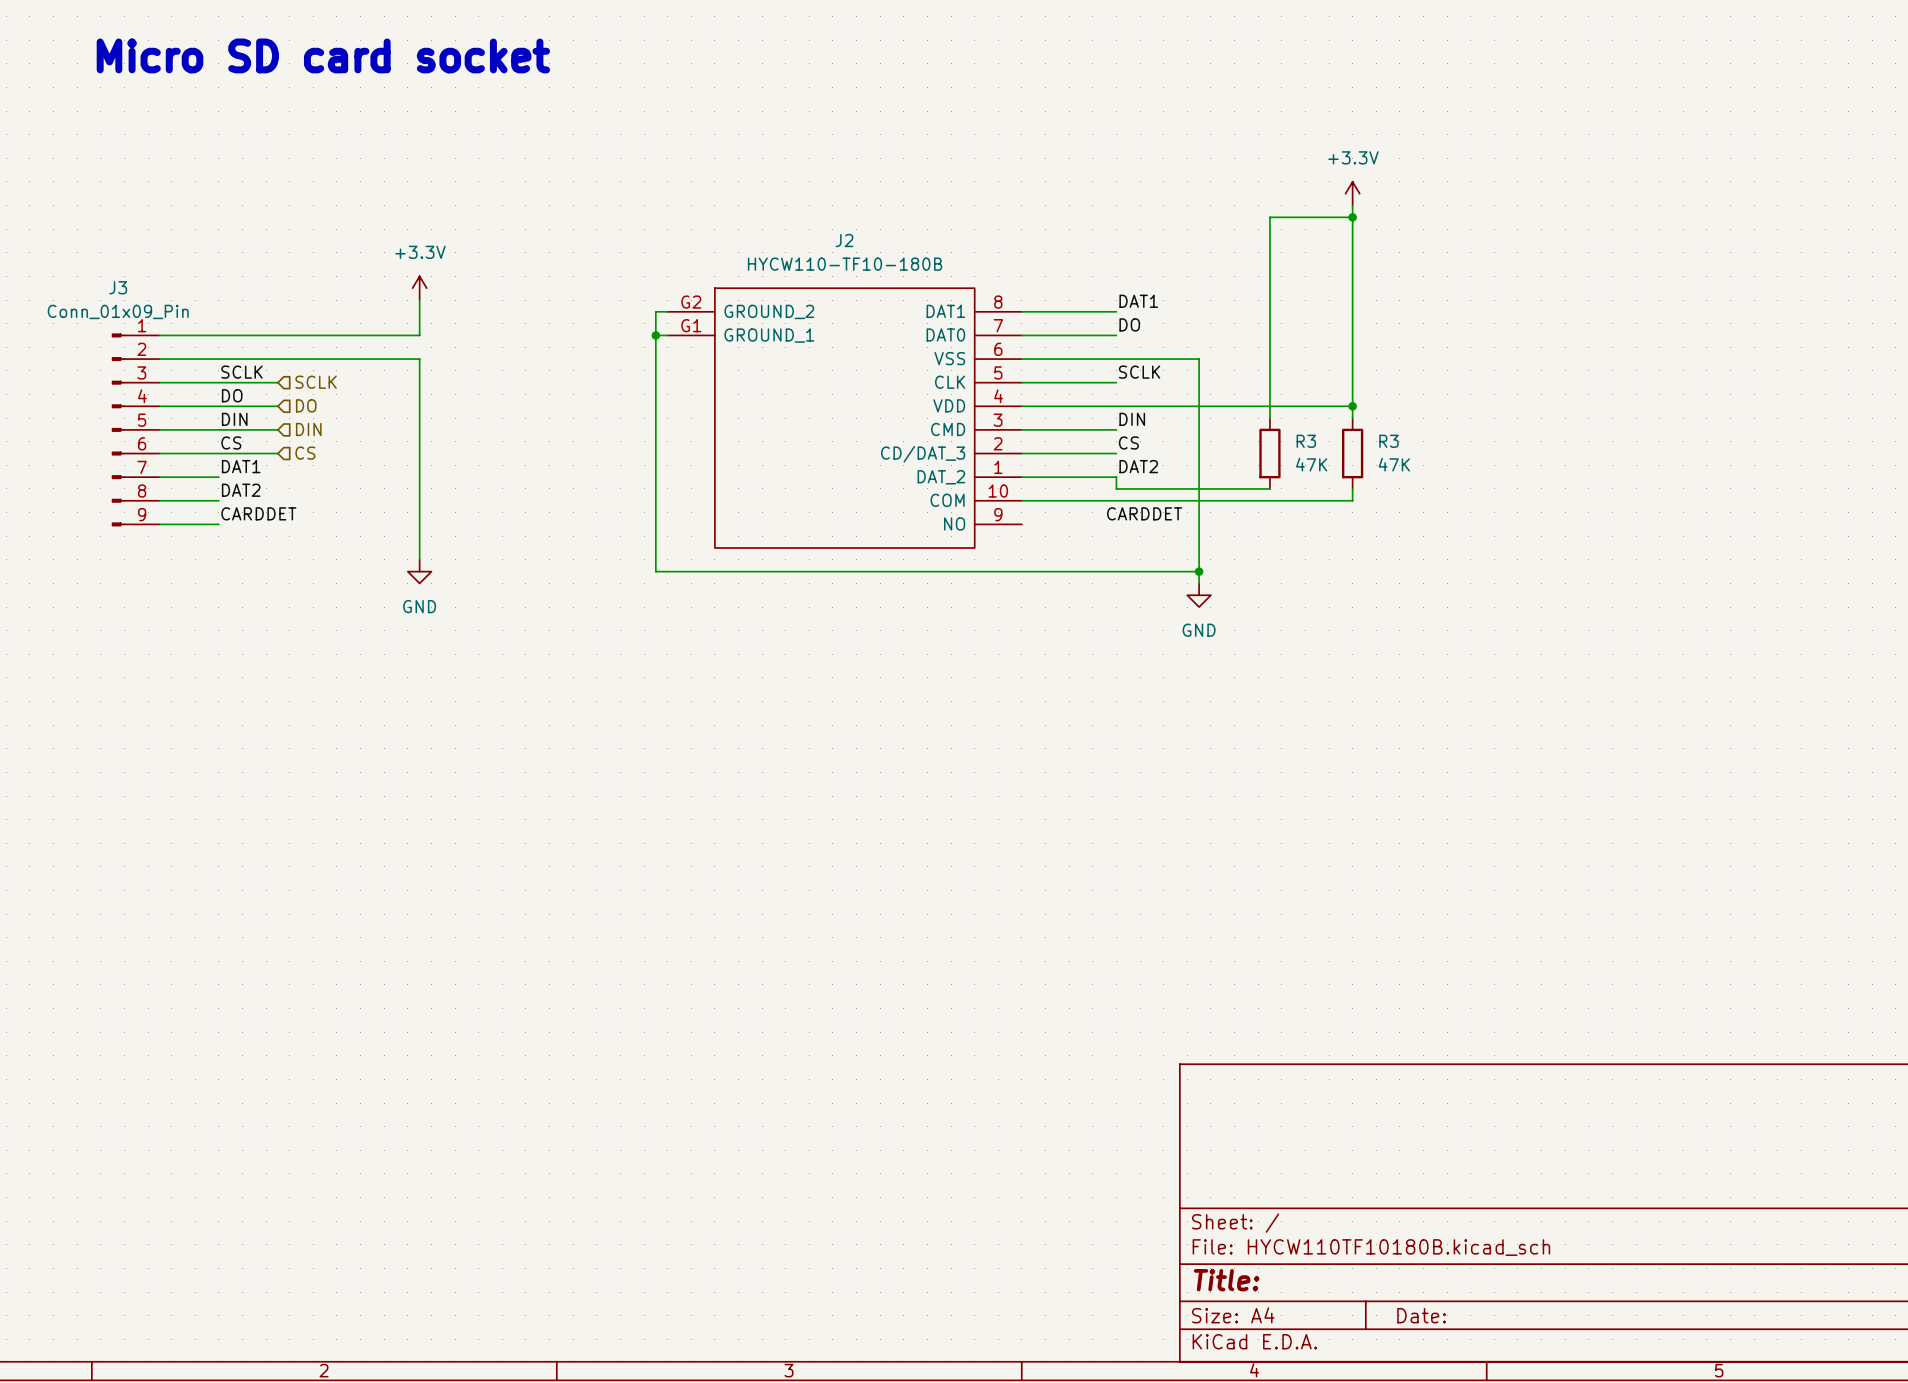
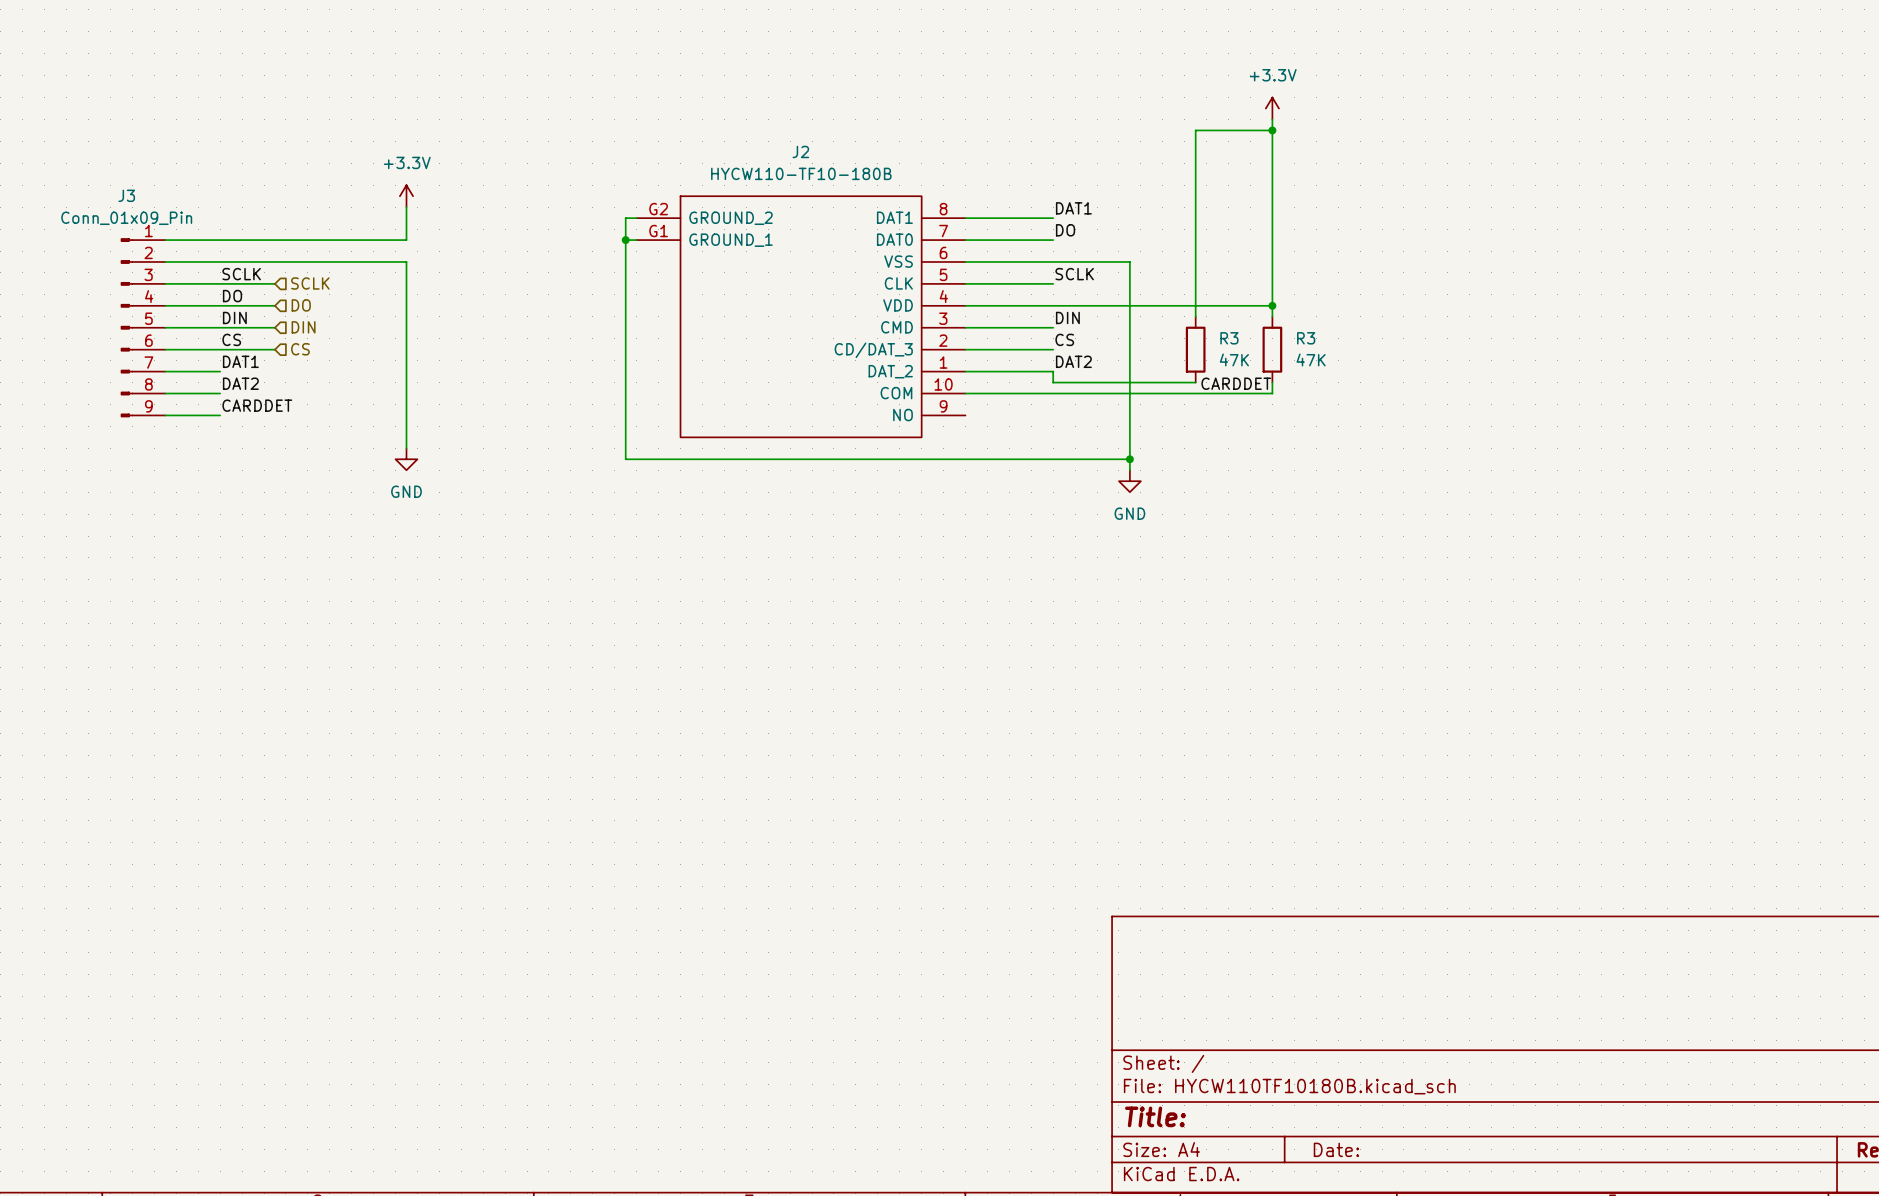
label: none -> CARDDET (1236, 383)
label: CARDDET (1144, 513) -> none

